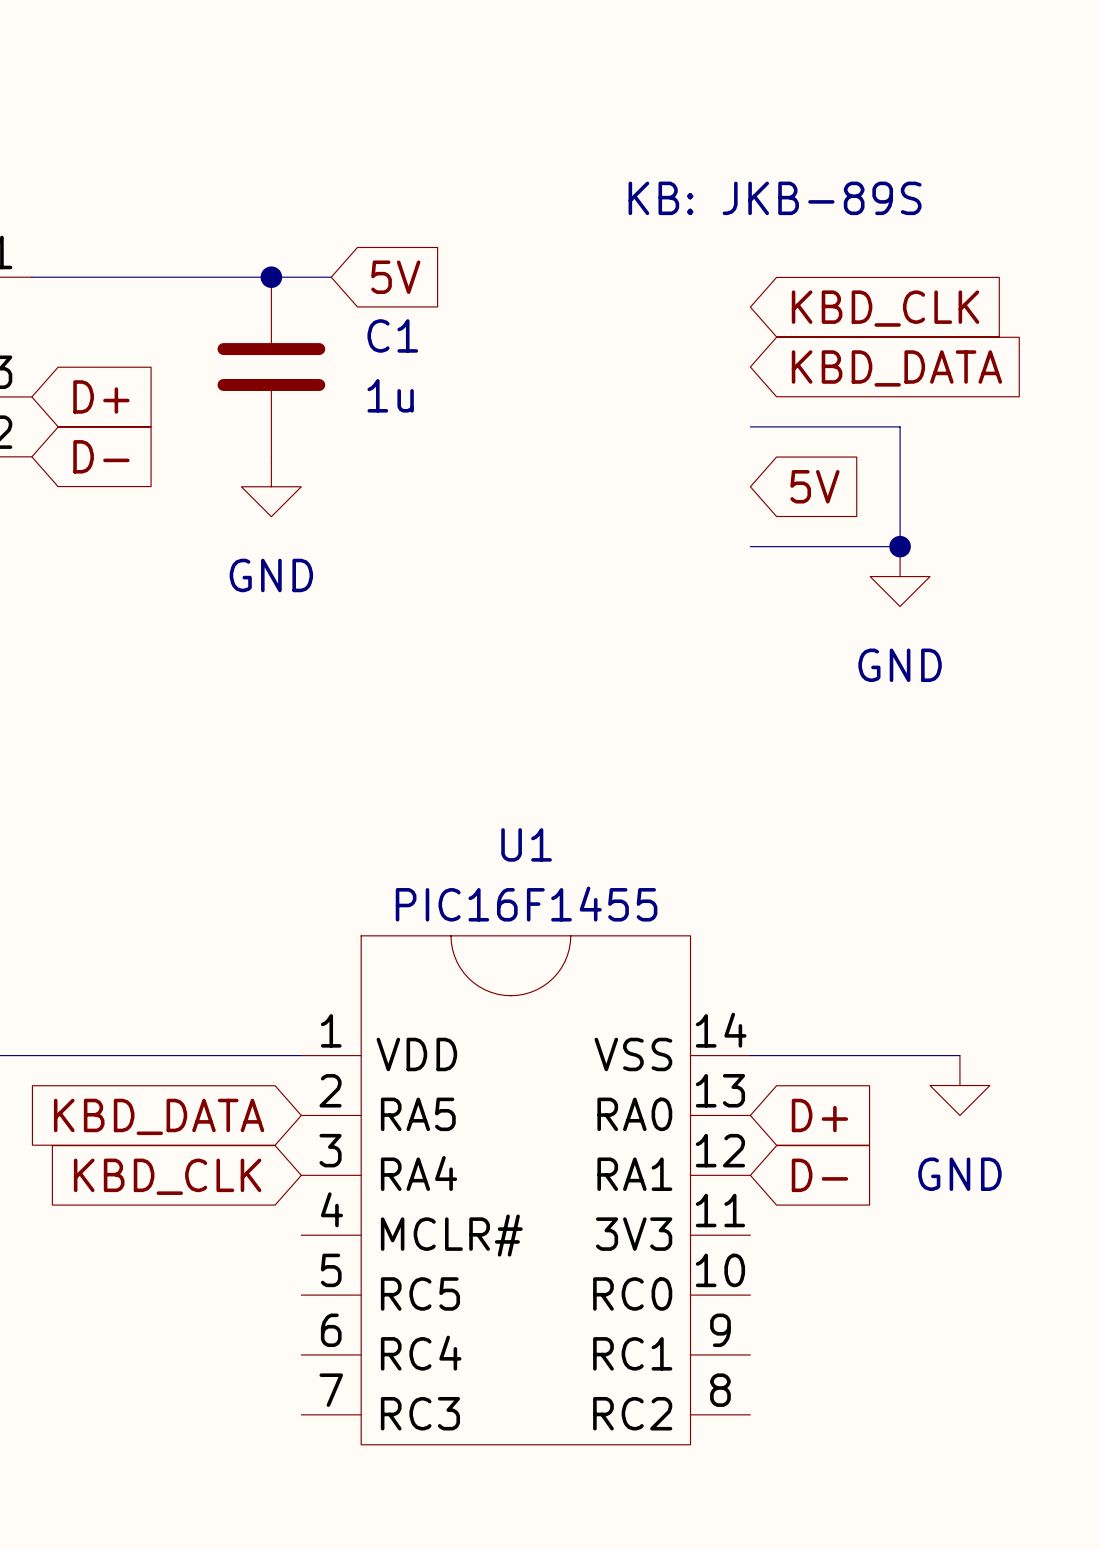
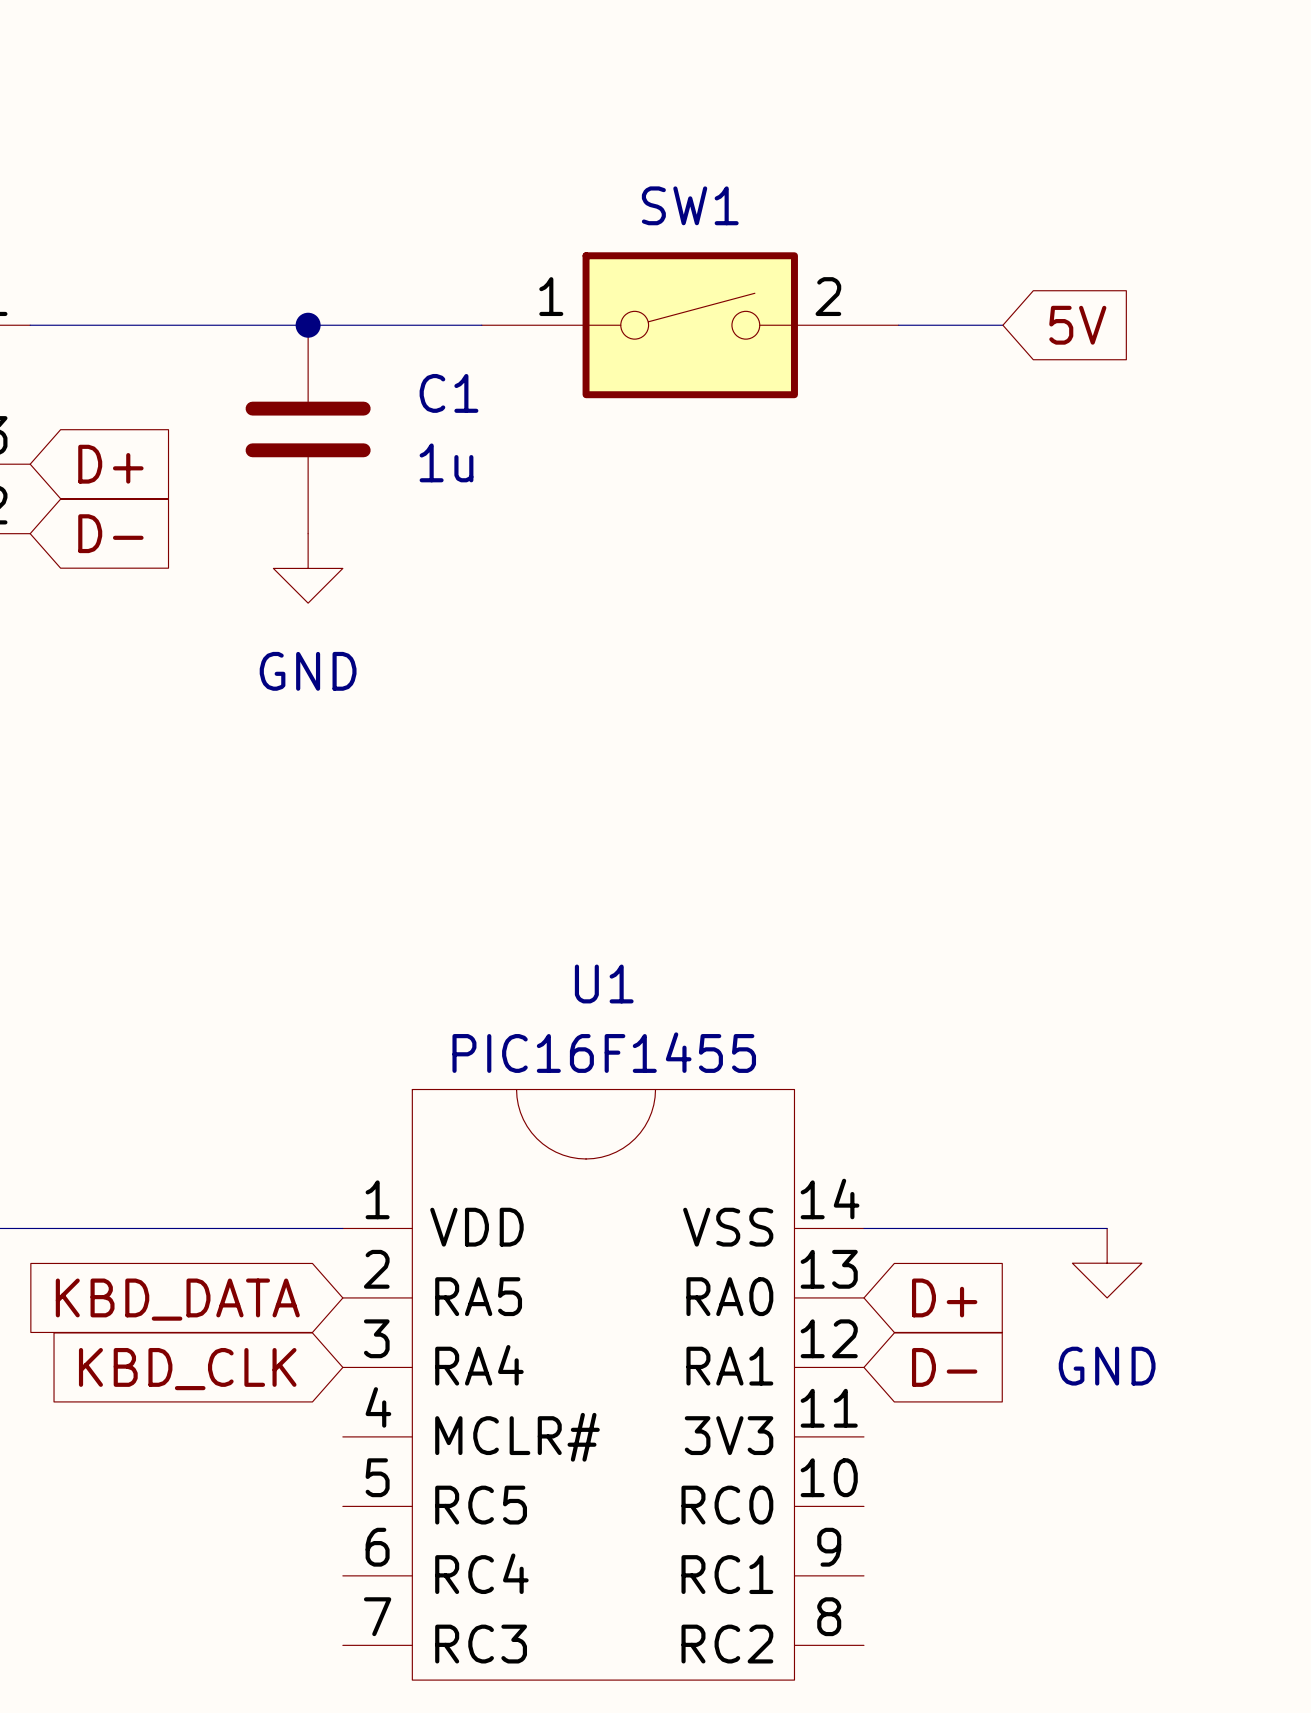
text: KB: JKB-89S (775, 198) -> none
wire: none -> (377, 325) (481, 325)
global label: 5V (395, 277) -> none
SW1: none -> (690, 325)
global label: KBD_CLK (885, 308) -> none
global label: KBD_DATA (896, 368) -> none
wire: (750, 426) (900, 426) (900, 546) (750, 546) -> none
global label position: 5V (814, 486) -> 5V (1077, 325)
junction: (900, 546) -> none
power symbol: GND (900, 576) -> none

